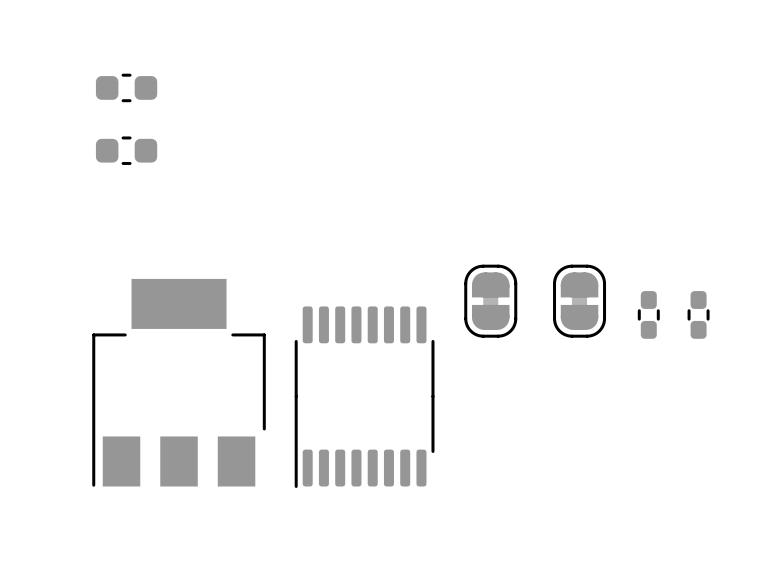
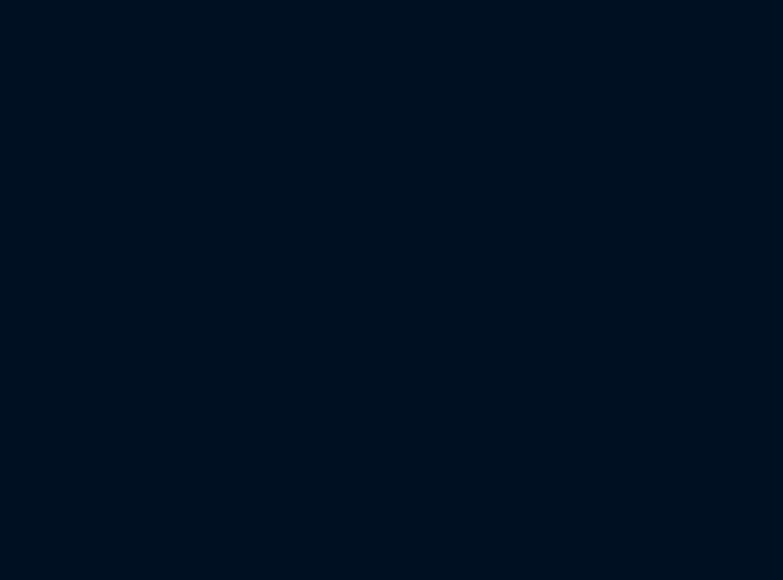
part: (126, 87) -> none
part: (126, 150) -> none
part: (490, 301) -> none
part: (579, 301) -> none
part: (648, 314) -> none
part: (698, 314) -> none
part: (179, 382) -> none
part: (364, 397) -> none

